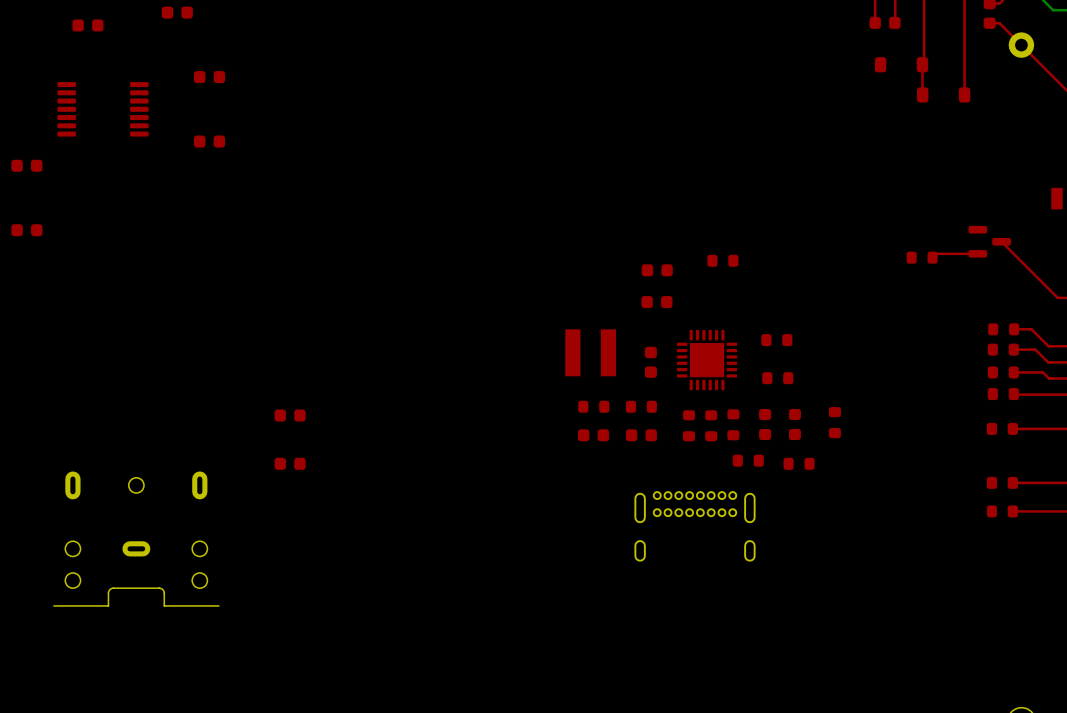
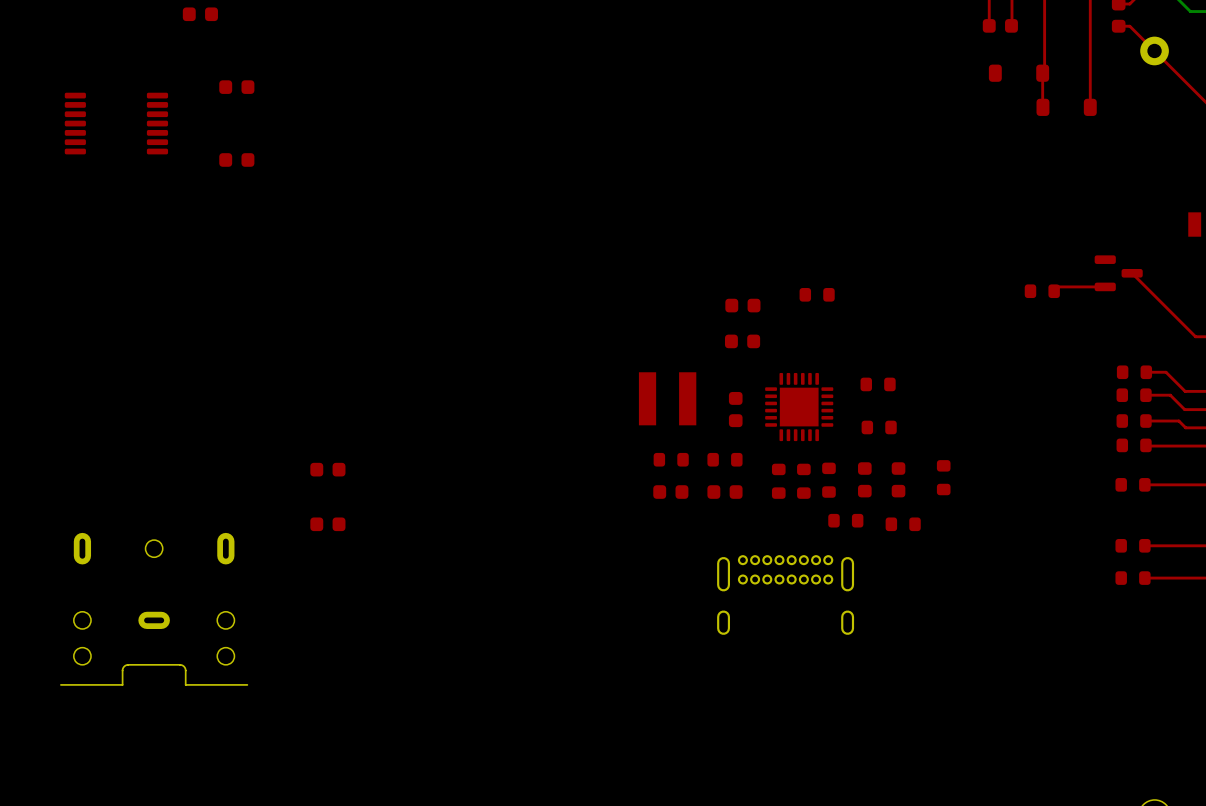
part: (87, 25) -> none
part: (26, 165) -> none
part: (26, 230) -> none

